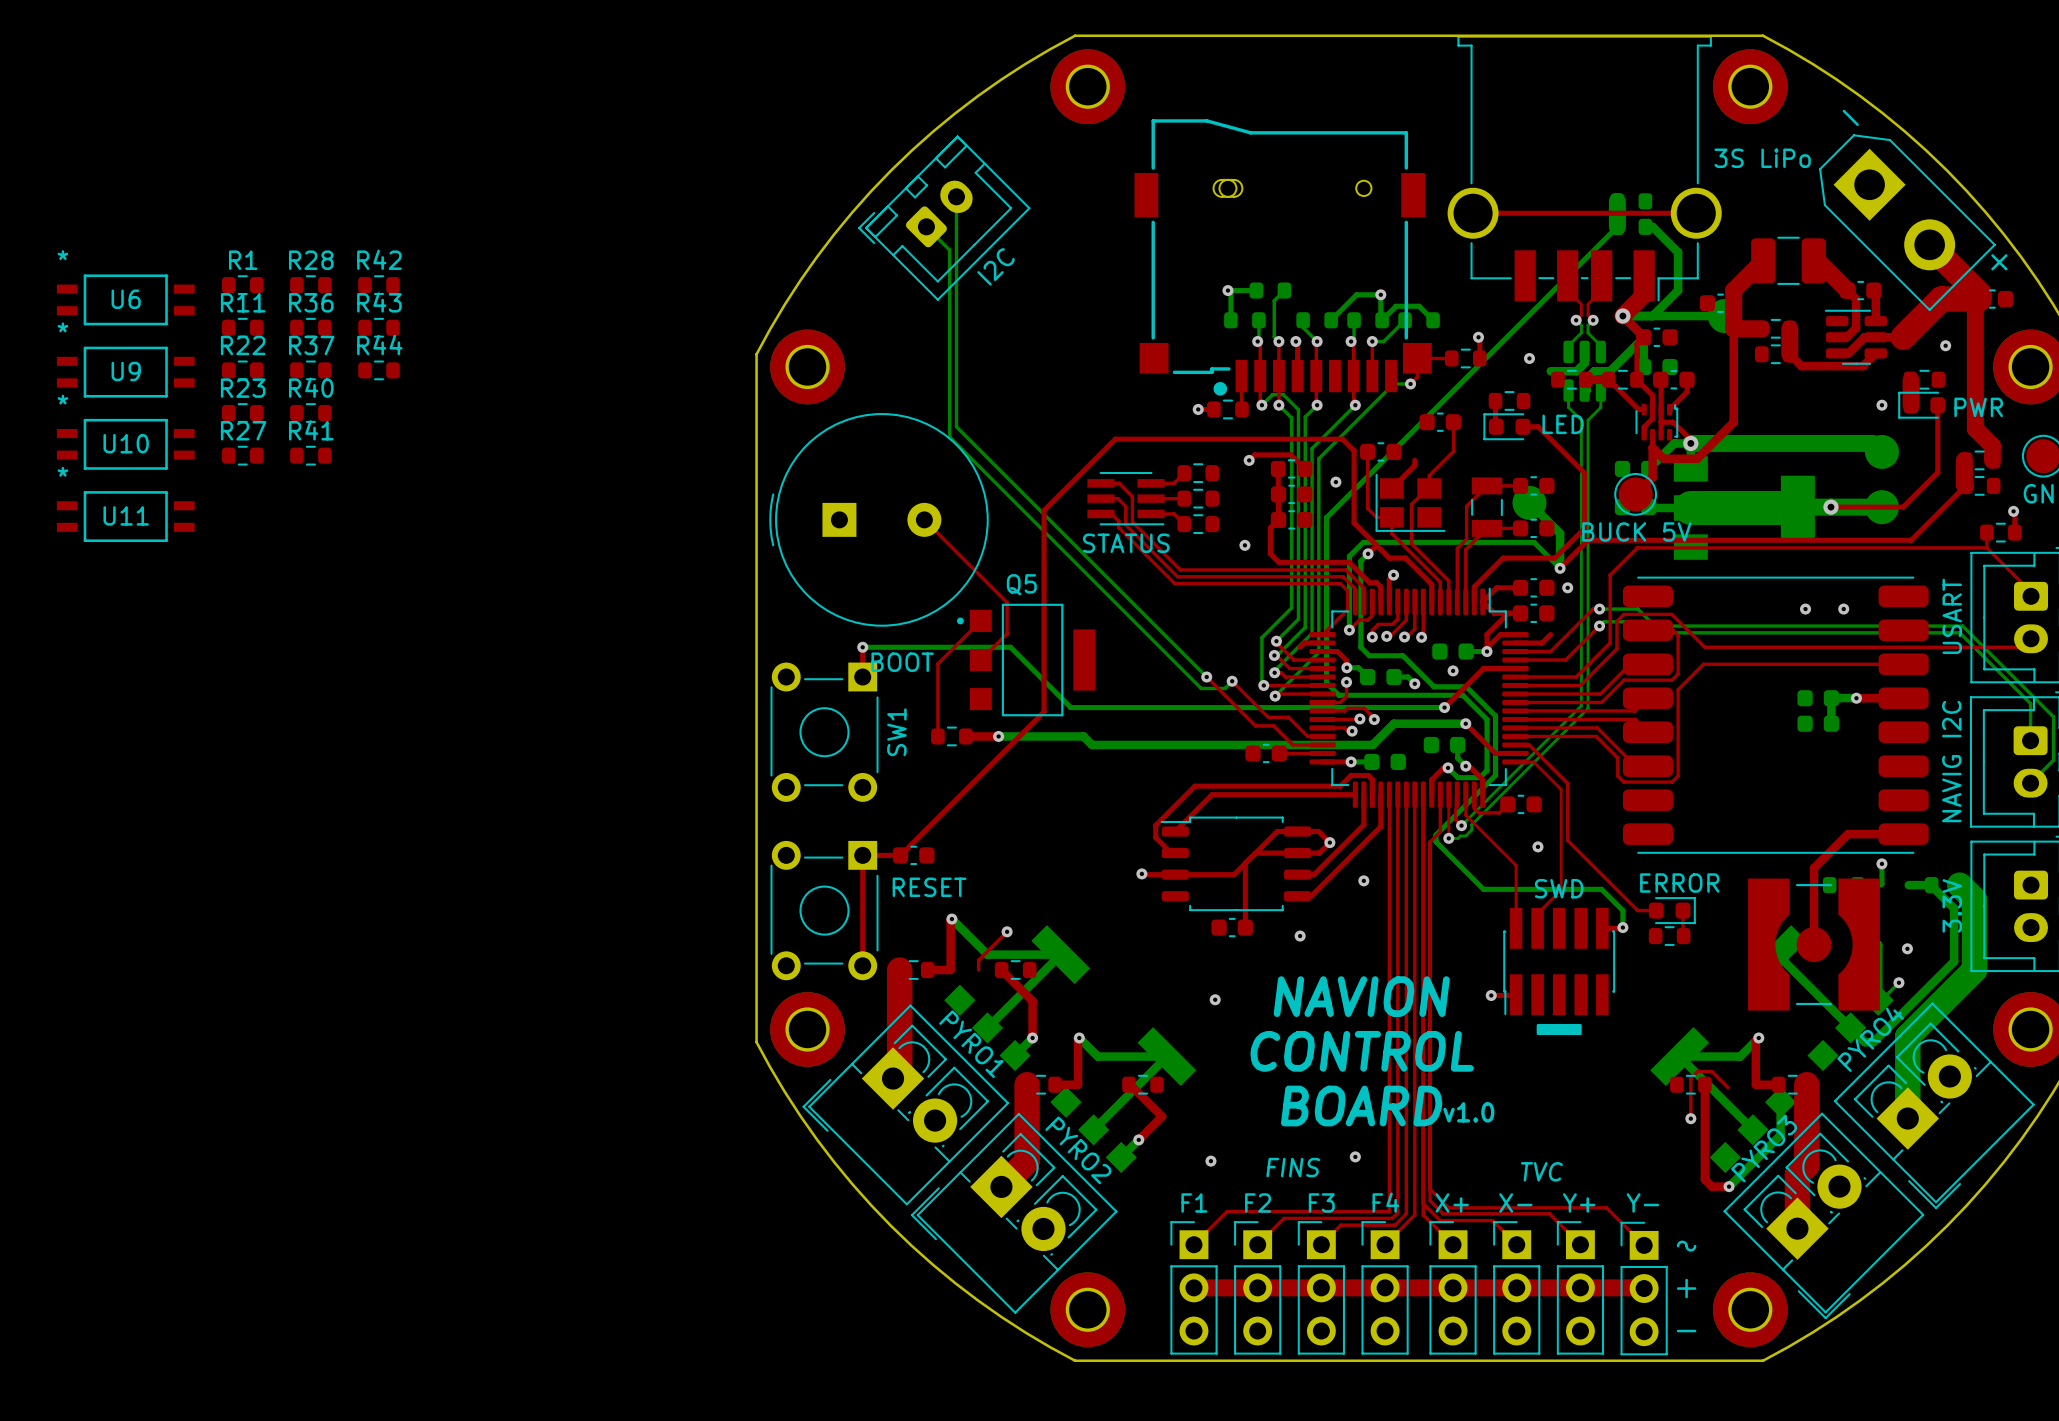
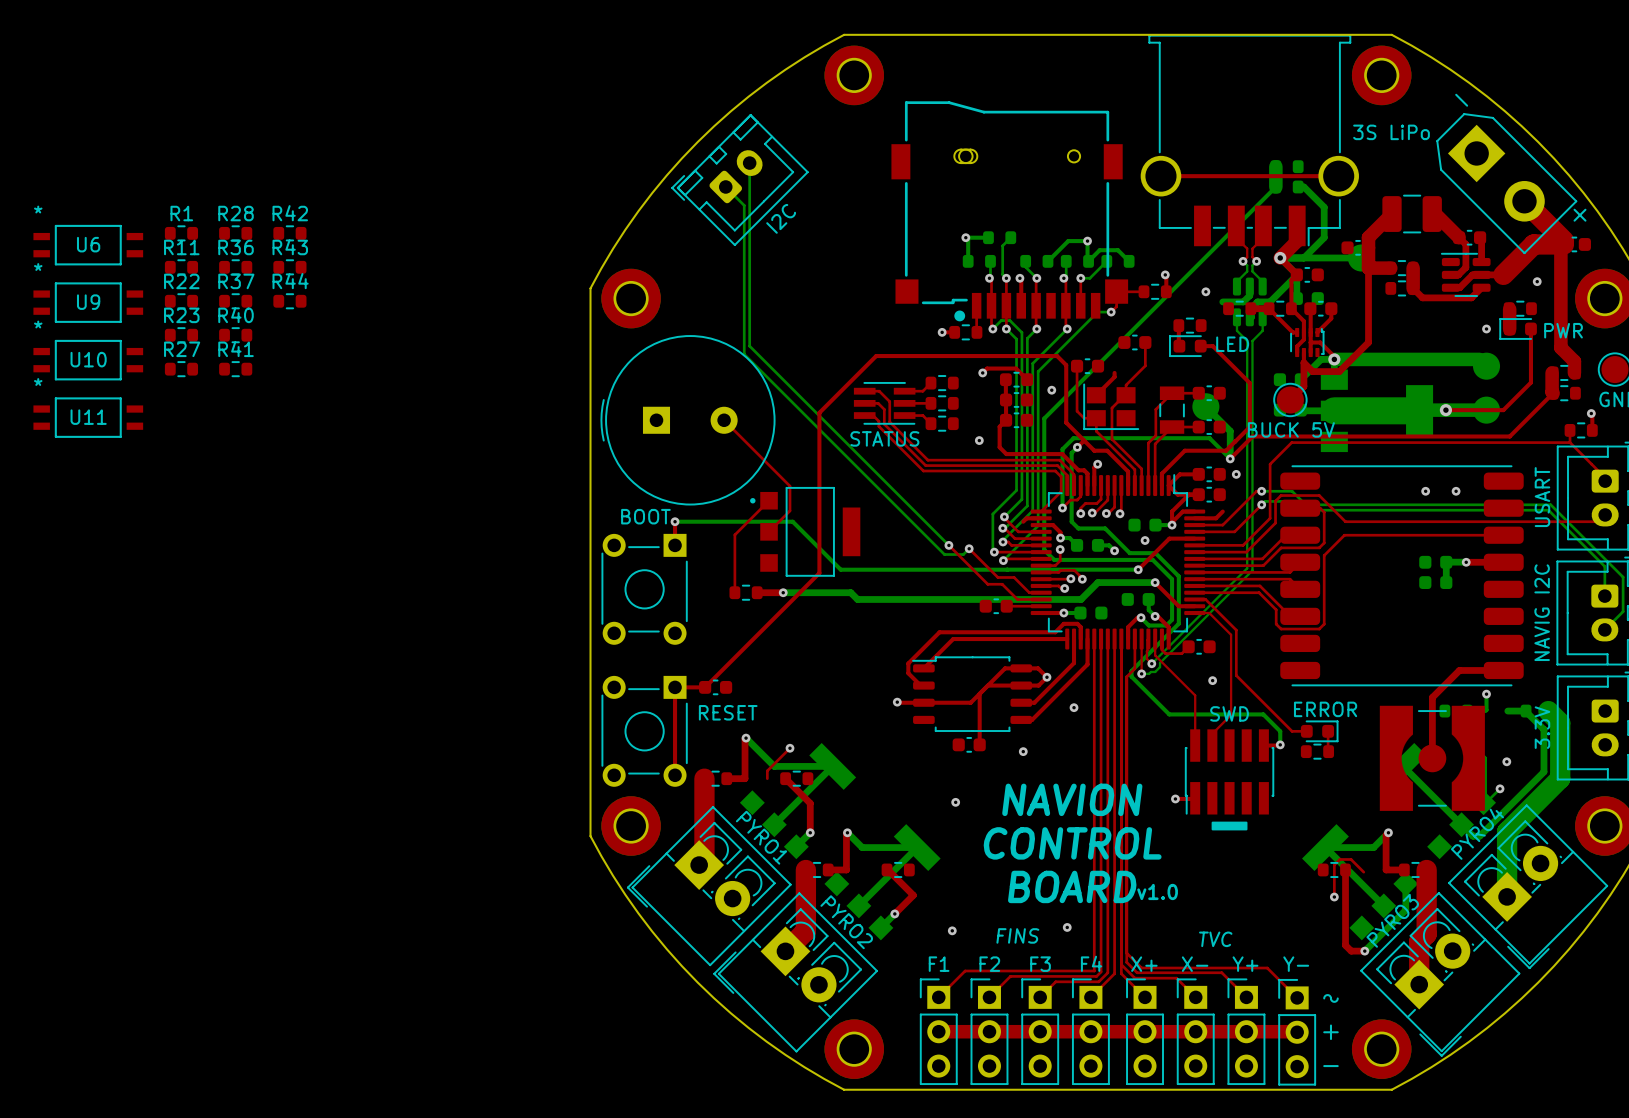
Q5 name: Q5 (1021, 584) -> none
text position: BOOT (902, 662) -> BOOT (645, 516)
SW1 name: SW1 (896, 732) -> none

